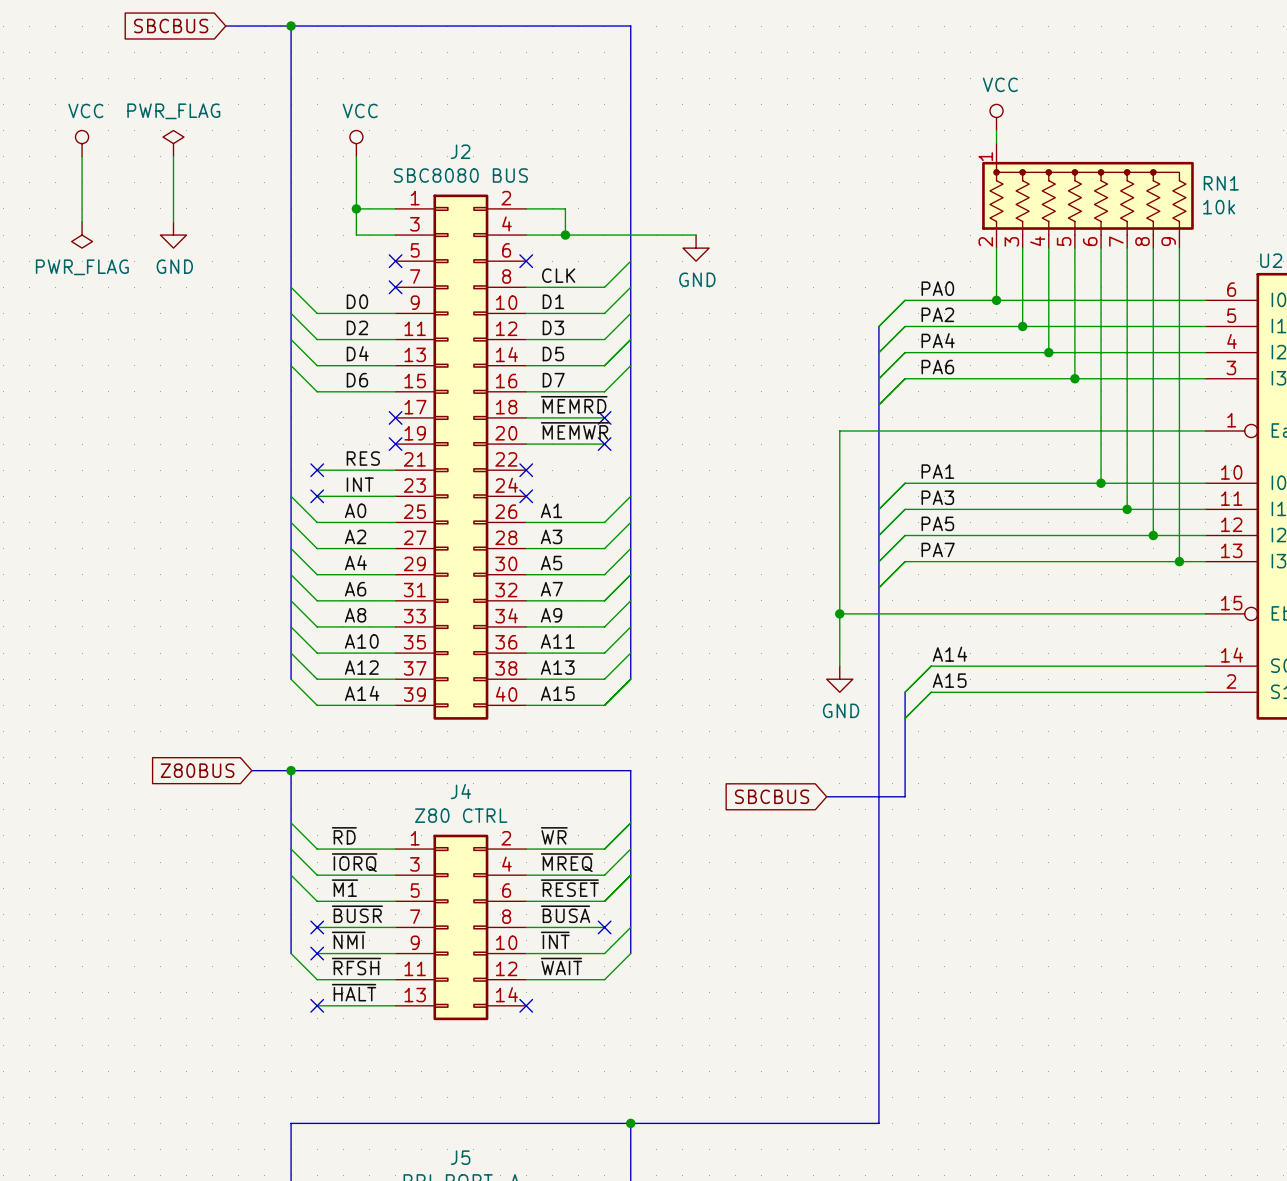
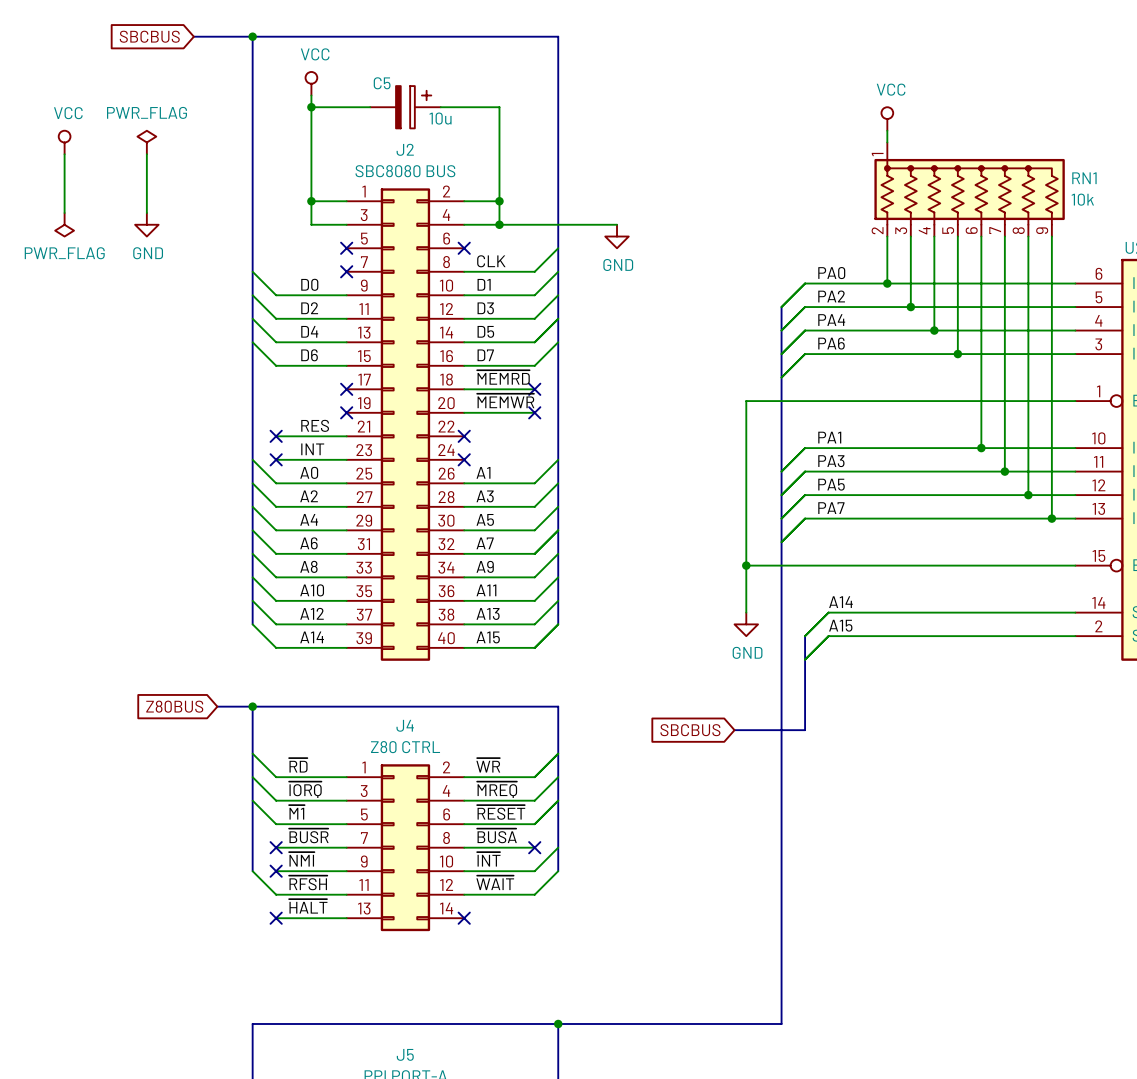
wire: none -> (311, 95) (311, 154)
wire: none -> (311, 107) (370, 107)
junction: none -> (311, 107)
C5: none -> 10u (405, 107)
wire: none -> (440, 107) (499, 107) (499, 201)
power symbol position: VCC (356, 143) -> VCC (311, 83)
junction: none -> (499, 201)

